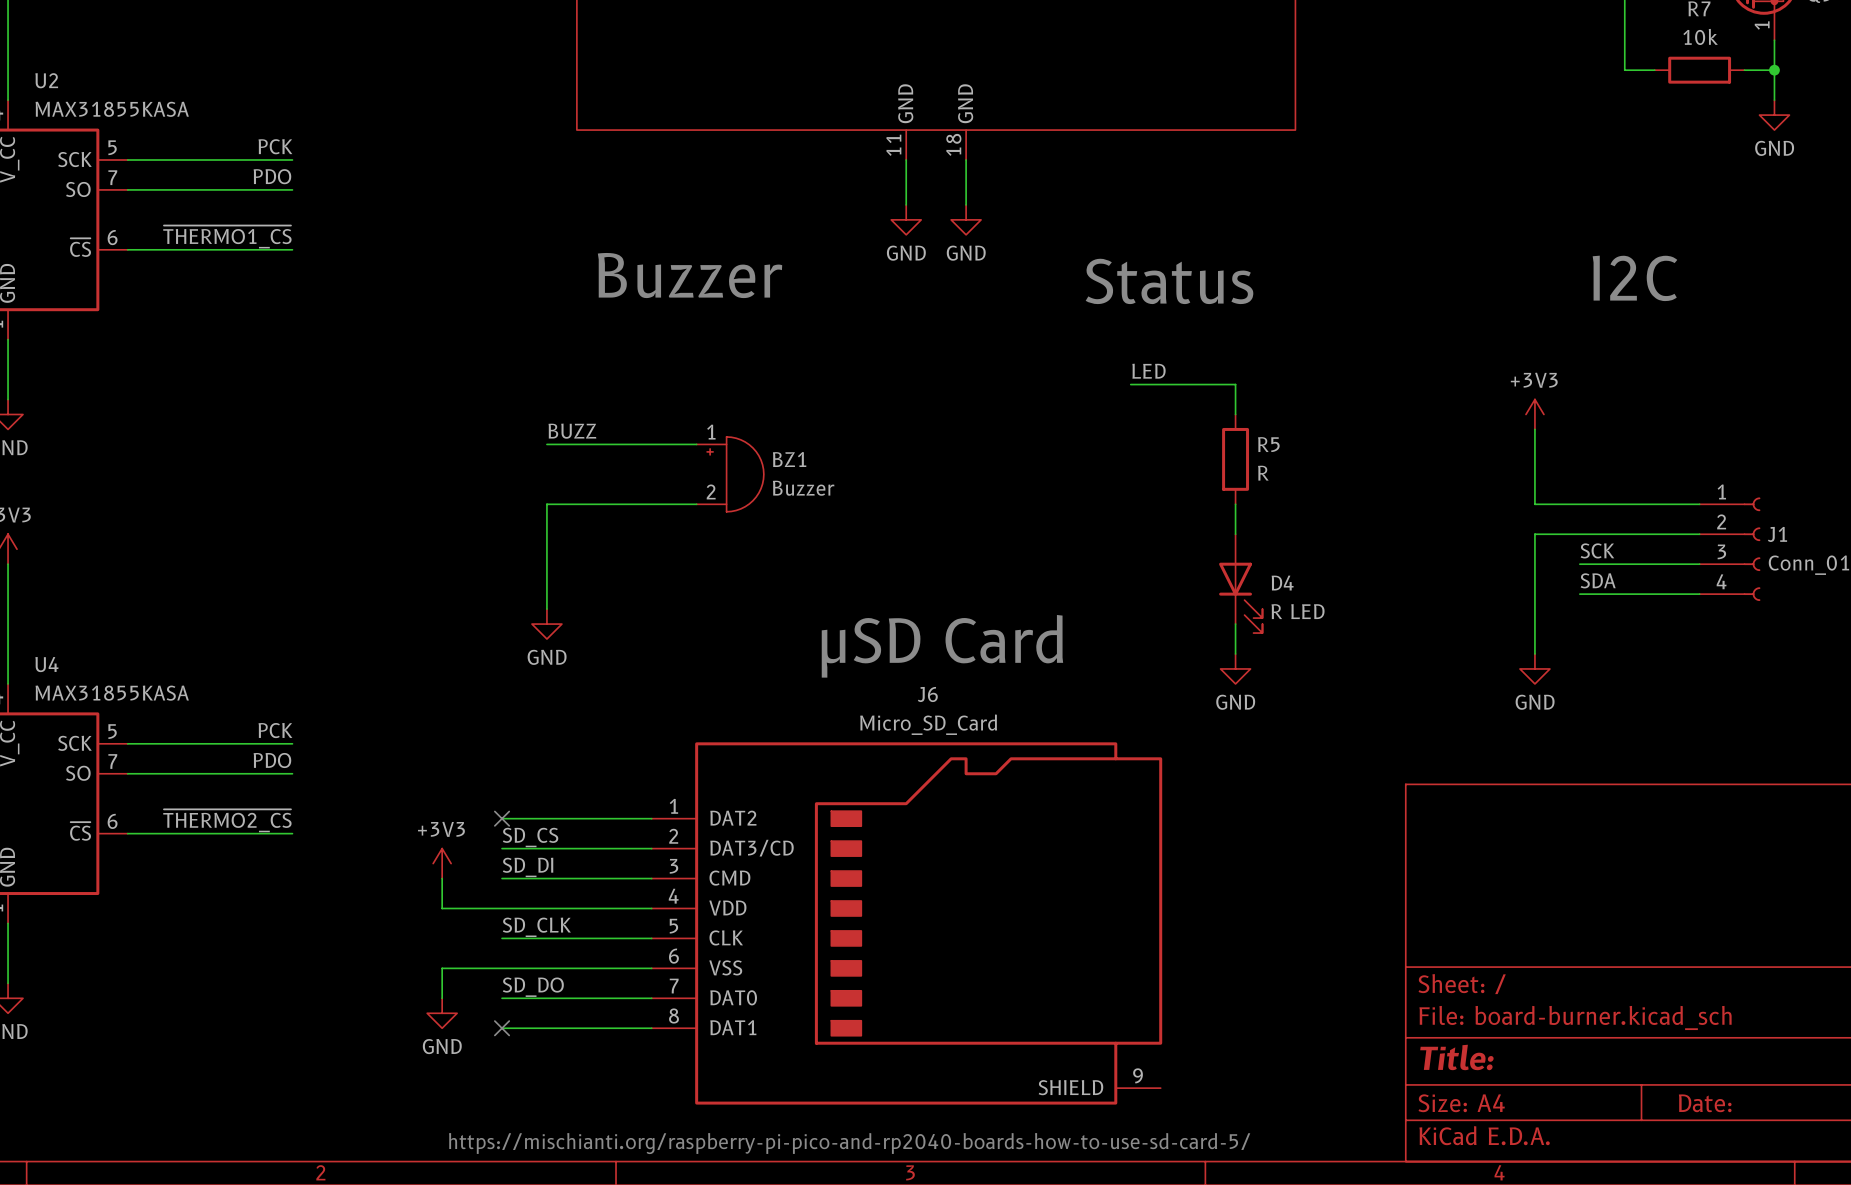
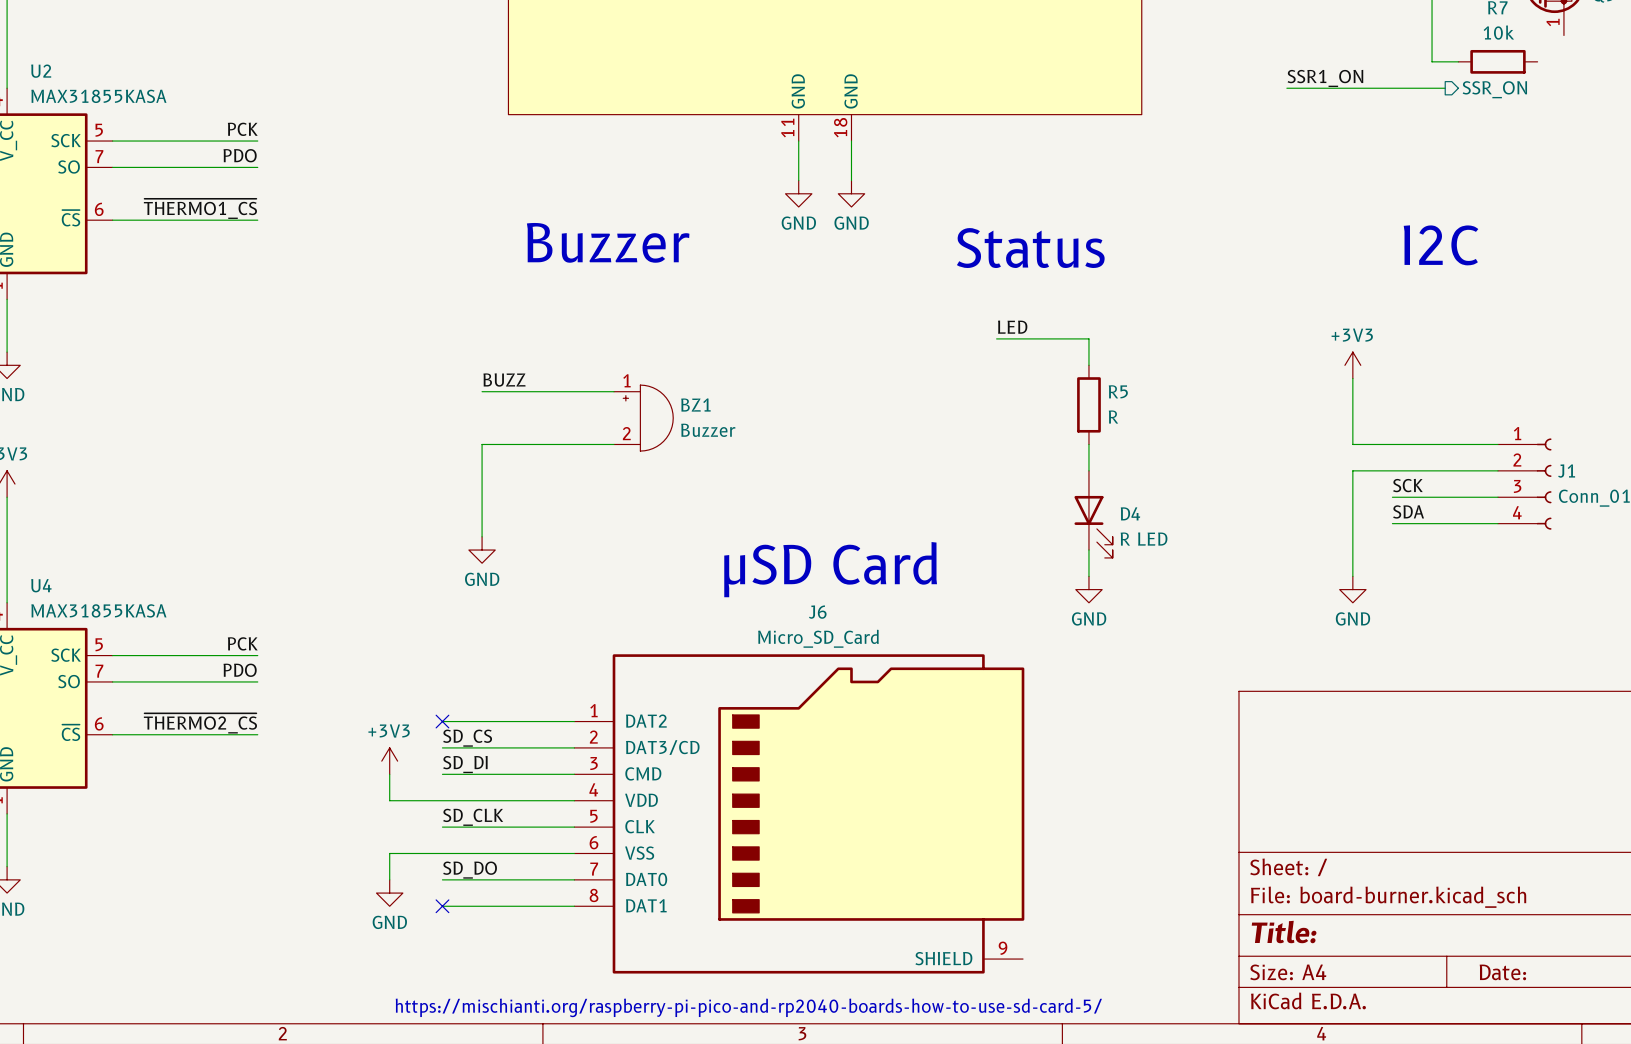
wire: (1774, 40) (1774, 100) -> none
wire: (1744, 70) (1774, 70) -> none
junction: (1774, 70) -> none
label: none -> SSR1_ON (1325, 78)
wire: none -> (1286, 88) (1445, 88)
sheet pin: none -> SSR_ON (1494, 89)
power symbol: GND (1774, 115) -> none

